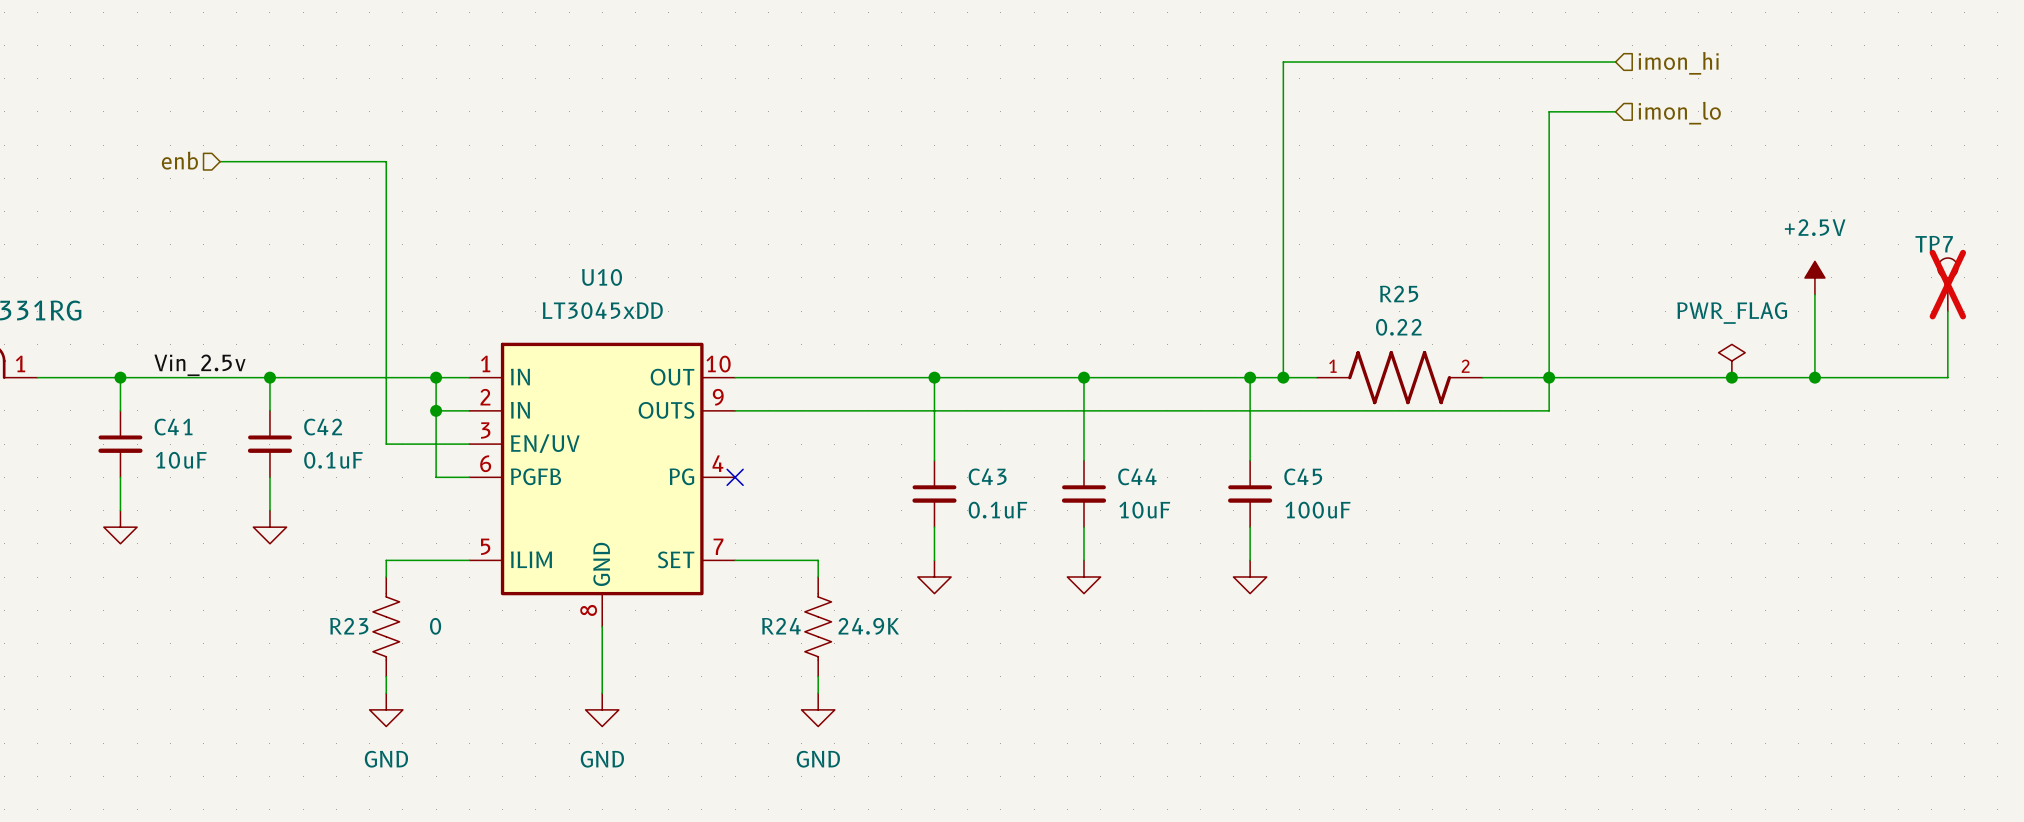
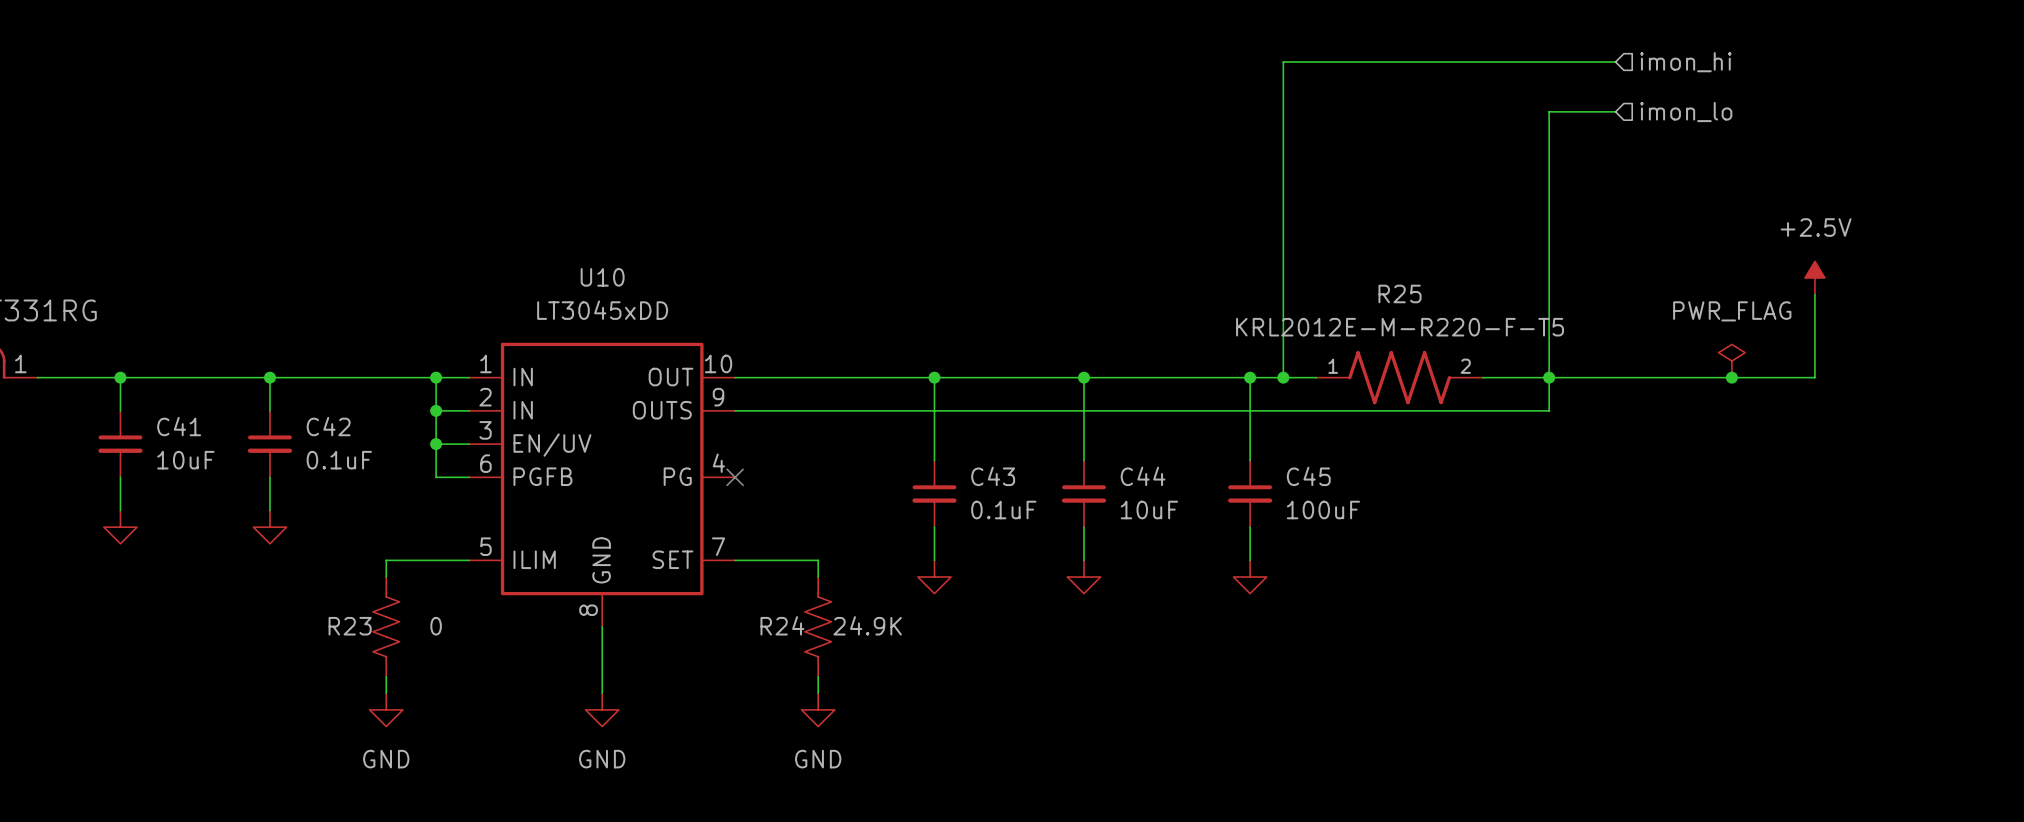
hierarchical label: enb (179, 160) -> none
wire: (220, 161) (386, 161) (386, 444) (436, 444) -> none
TP7: (1947, 284) -> none
wire: (1947, 311) (1947, 377) (1814, 377) -> none
R25 value: 0.22 (1398, 327) -> KRL2012E-M-R220-F-T5 (1400, 327)
label: Vin_2.5v (199, 365) -> none
junction: (1814, 377) -> none
junction: none -> (436, 444)

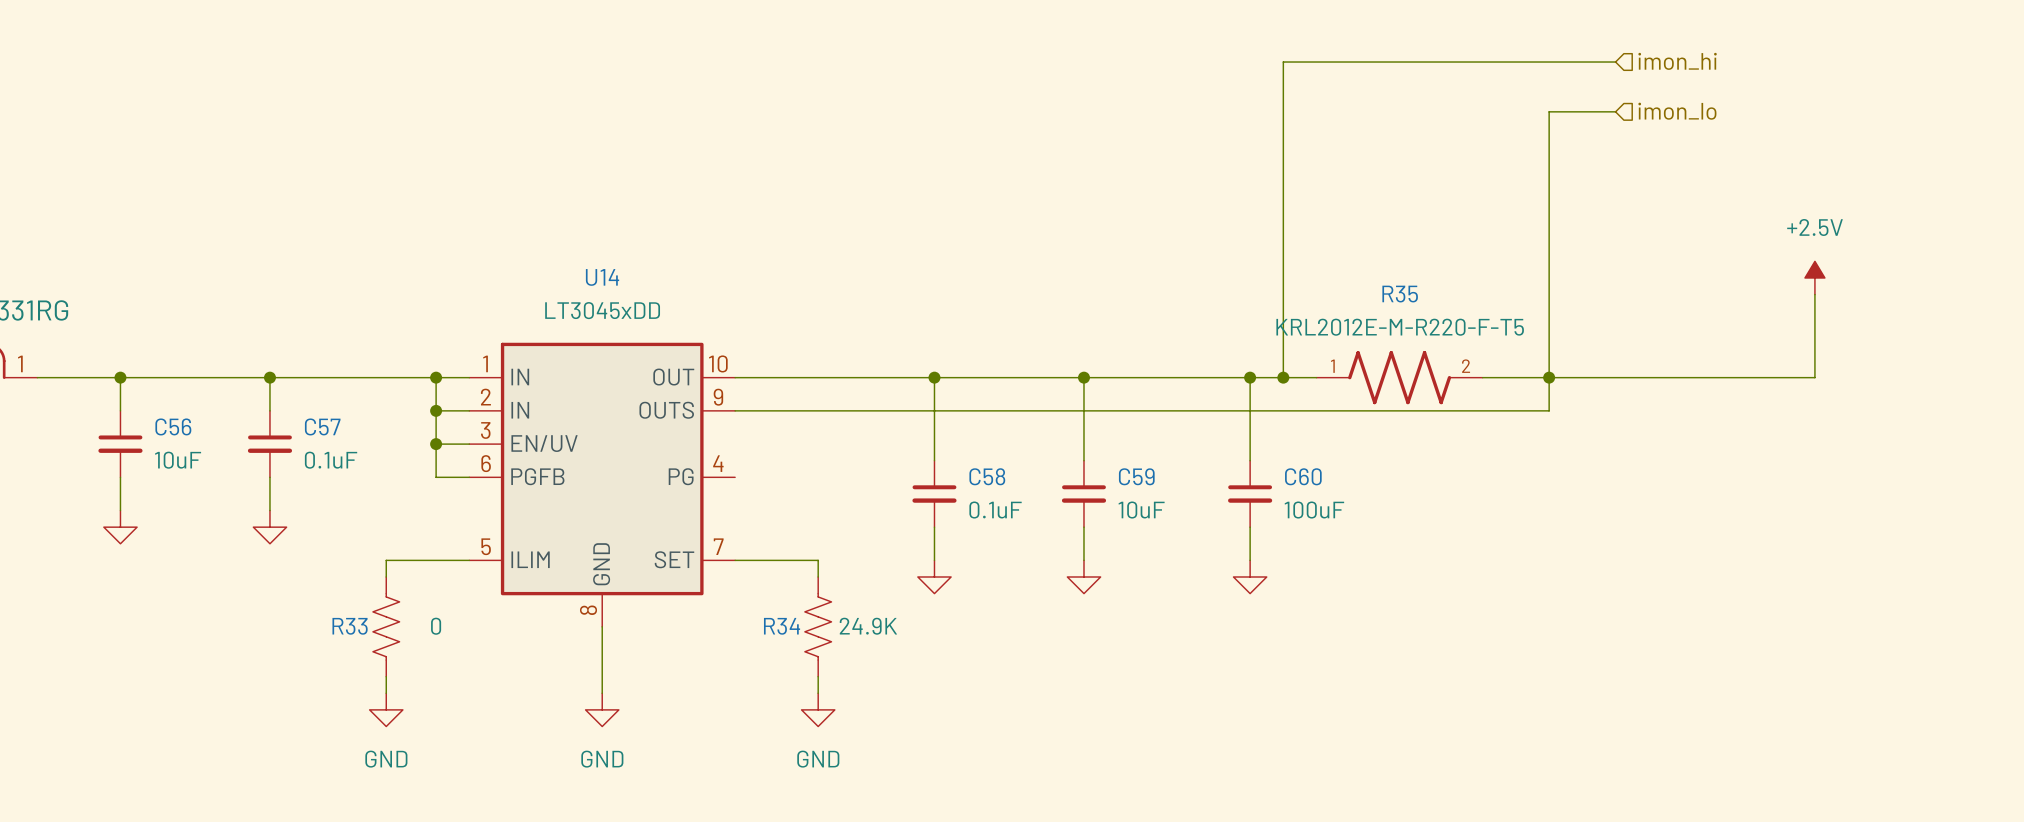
U10 name: U10 (602, 277) -> U14 (602, 277)
R25 name: R25 (1400, 293) -> R35 (1400, 294)
power symbol: PWR_FLAG (1731, 361) -> none
junction: (1731, 377) -> none
C41 name: C41 (179, 426) -> C56 (173, 426)
C42 name: C42 (328, 426) -> C57 (322, 426)
C43 name: C43 (993, 476) -> C58 (987, 476)
C44 name: C44 (1143, 476) -> C59 (1136, 476)
C45 name: C45 (1308, 476) -> C60 (1303, 476)
no-connect mark: (735, 477) -> none
R24 name: R24 (782, 625) -> R34 (782, 626)
R23 name: R23 (350, 626) -> R33 (350, 626)

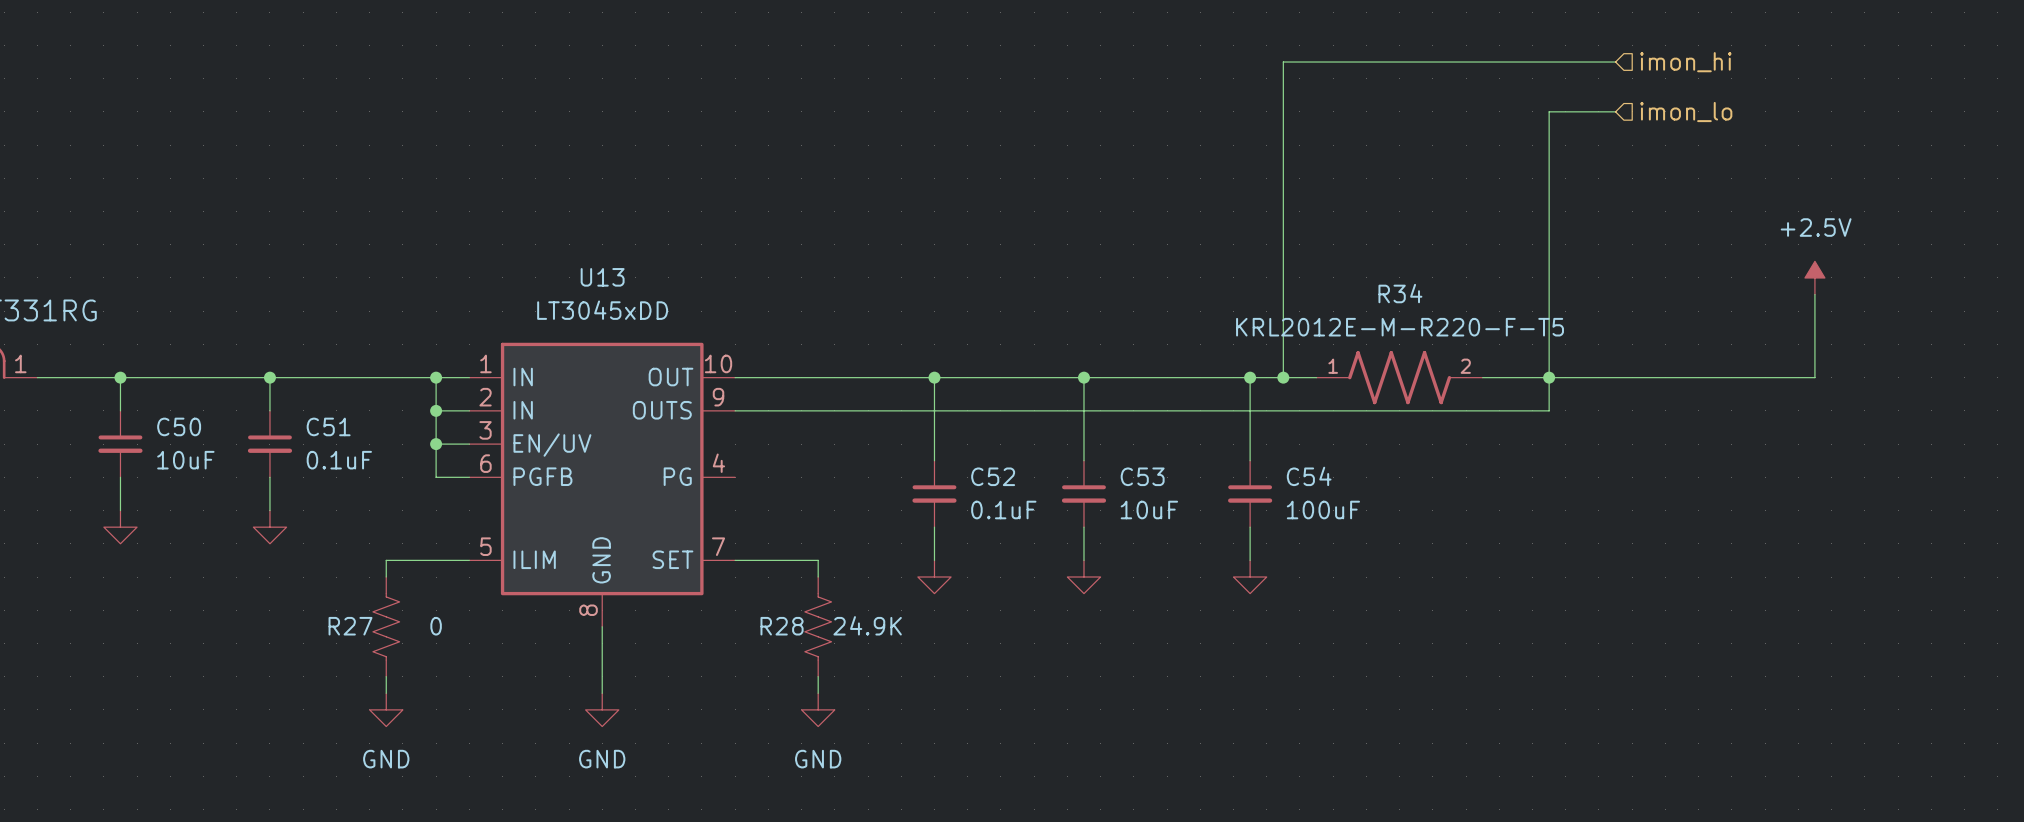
U14 name: U14 (602, 277) -> U13 (602, 277)
R35 name: R35 (1400, 294) -> R34 (1400, 293)
C56 name: C56 (173, 426) -> C50 (179, 426)
C57 name: C57 (322, 426) -> C51 (328, 426)
C58 name: C58 (987, 476) -> C52 (993, 476)
C59 name: C59 (1136, 476) -> C53 (1142, 476)
C60 name: C60 (1303, 476) -> C54 (1309, 476)
R33 name: R33 (350, 626) -> R27 (350, 626)
R34 name: R34 (782, 626) -> R28 (782, 626)

